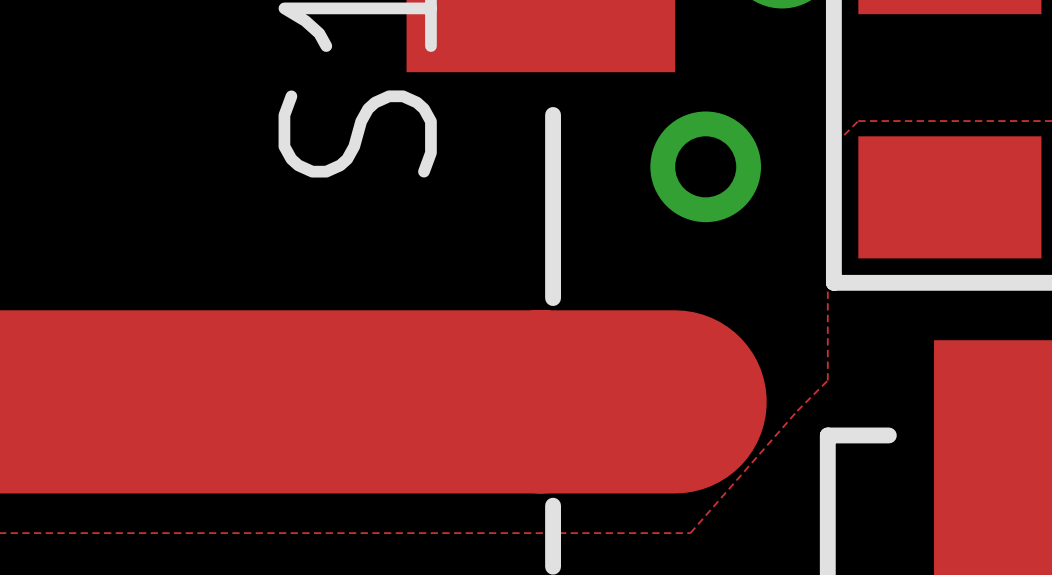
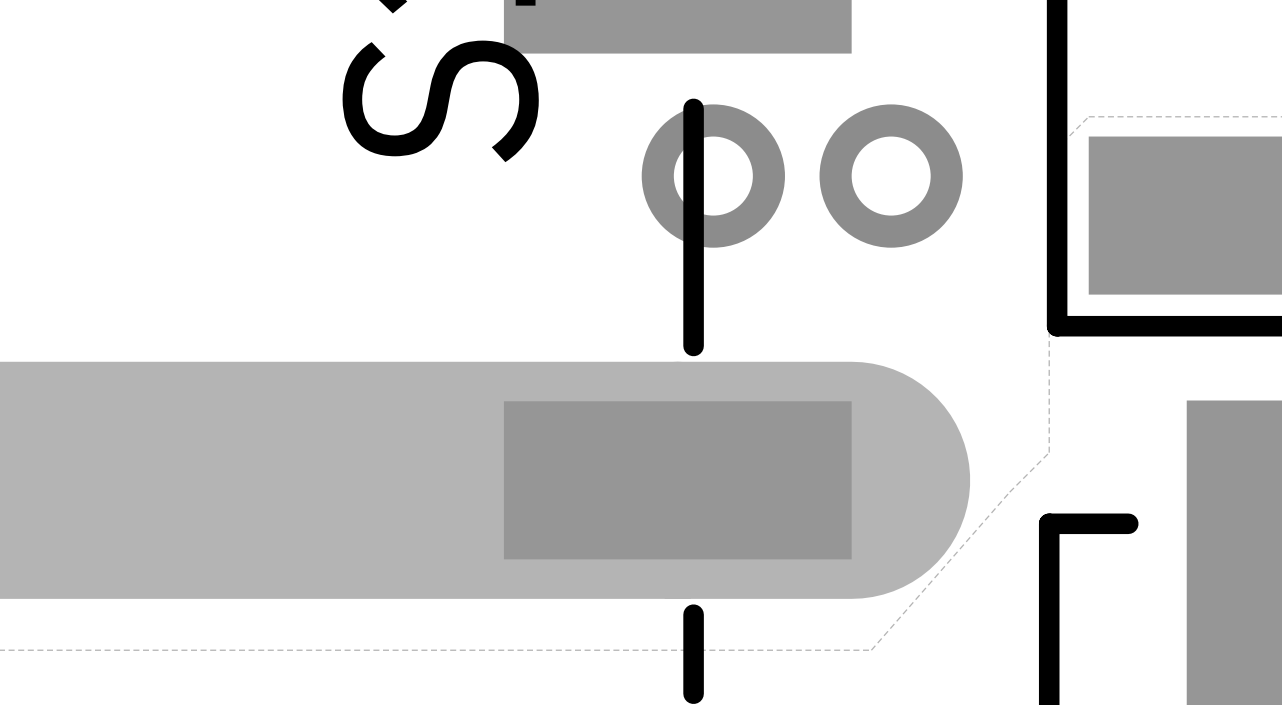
via: none -> (713, 176)

